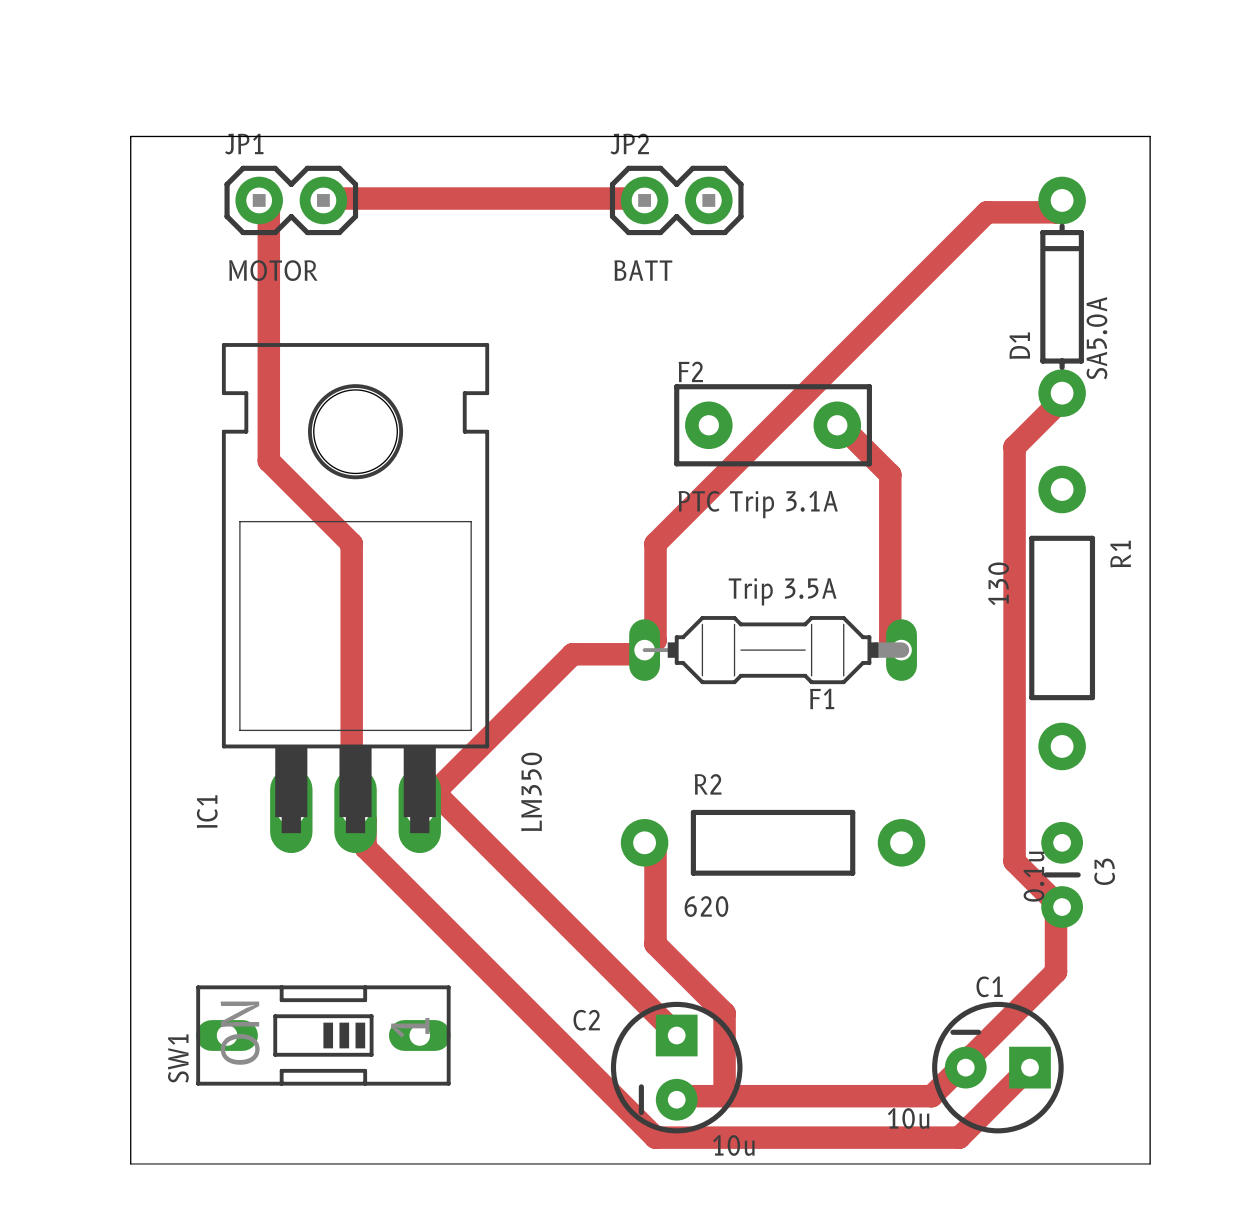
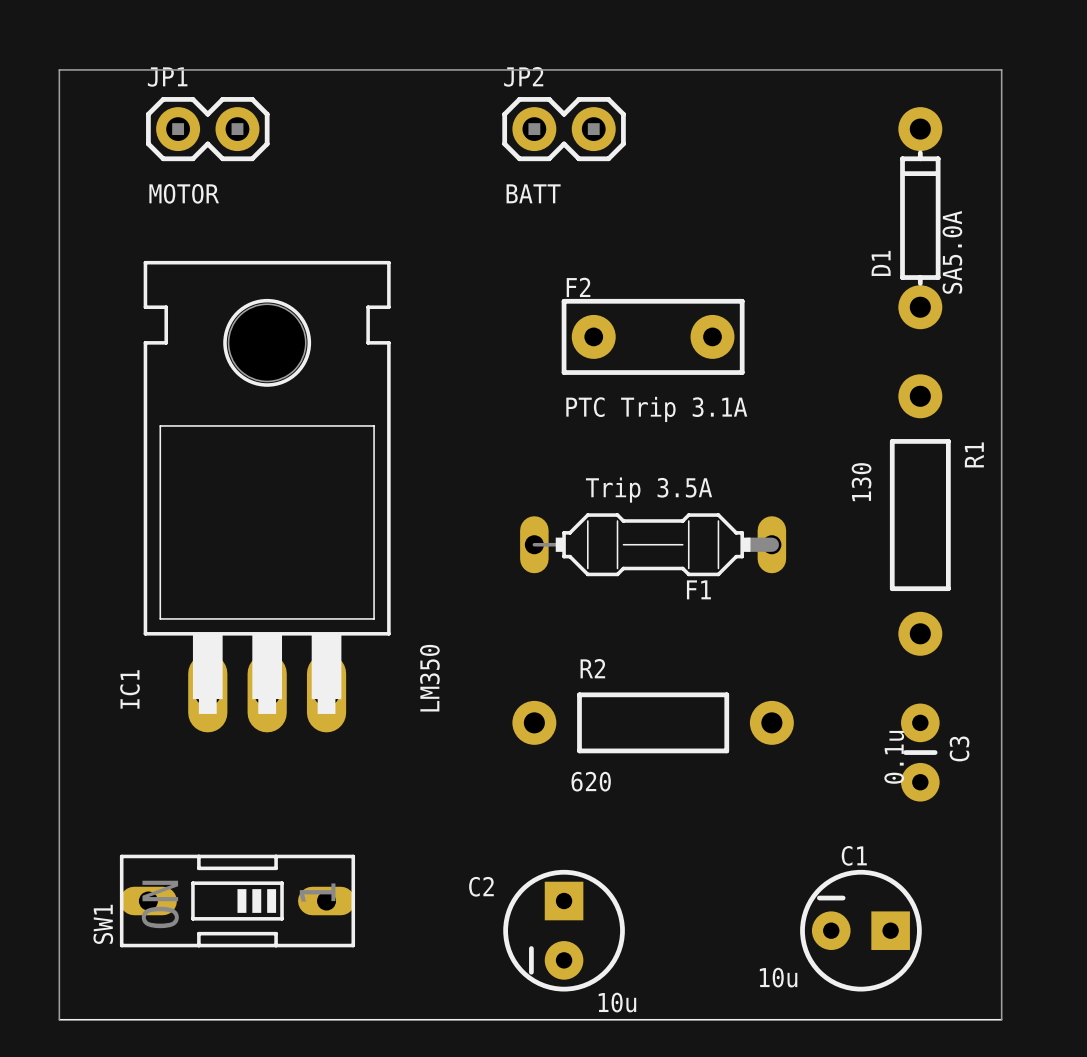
track: (259, 200) (268, 212) (268, 460) (351, 543) (351, 806) (365, 819) (365, 847) (655, 1137) (959, 1137) (1030, 1067) -> none
track: (323, 200) (324, 198) (641, 198) (644, 200) -> none
track: (1062, 200) (1056, 212) (986, 212) (655, 543) (655, 640) (641, 654) (572, 654) (420, 806) (419, 810) (434, 792) (676, 1035) -> none
track: (1062, 393) (1056, 405) (1014, 447) (1014, 861) (1062, 907) (1056, 916) (1056, 971) (973, 1054) (965, 1067) (959, 1068) (931, 1096) (683, 1096) (676, 1099) -> none
track: (837, 425) (848, 433) (890, 474) (890, 640) (901, 650) -> none
track: (644, 842) (655, 847) (655, 944) (724, 1013) (724, 1096) -> none

